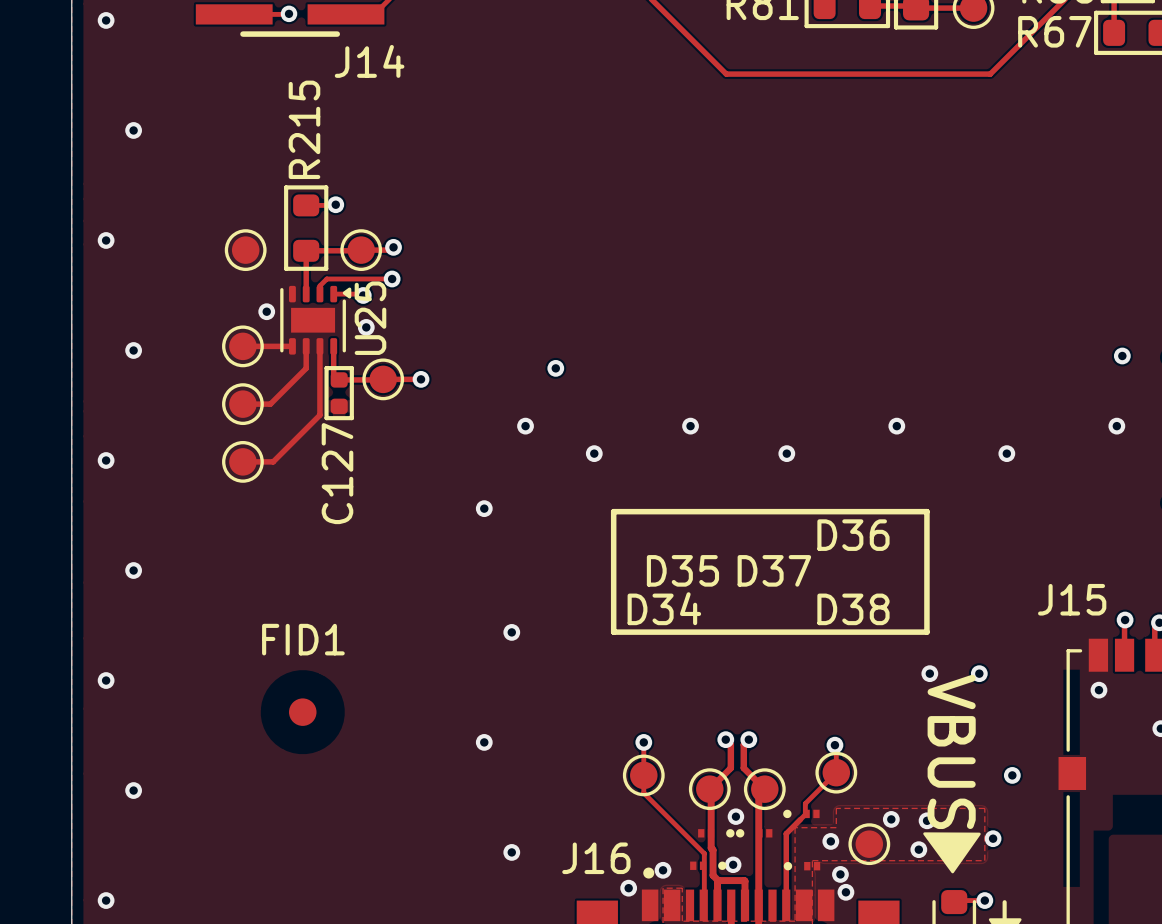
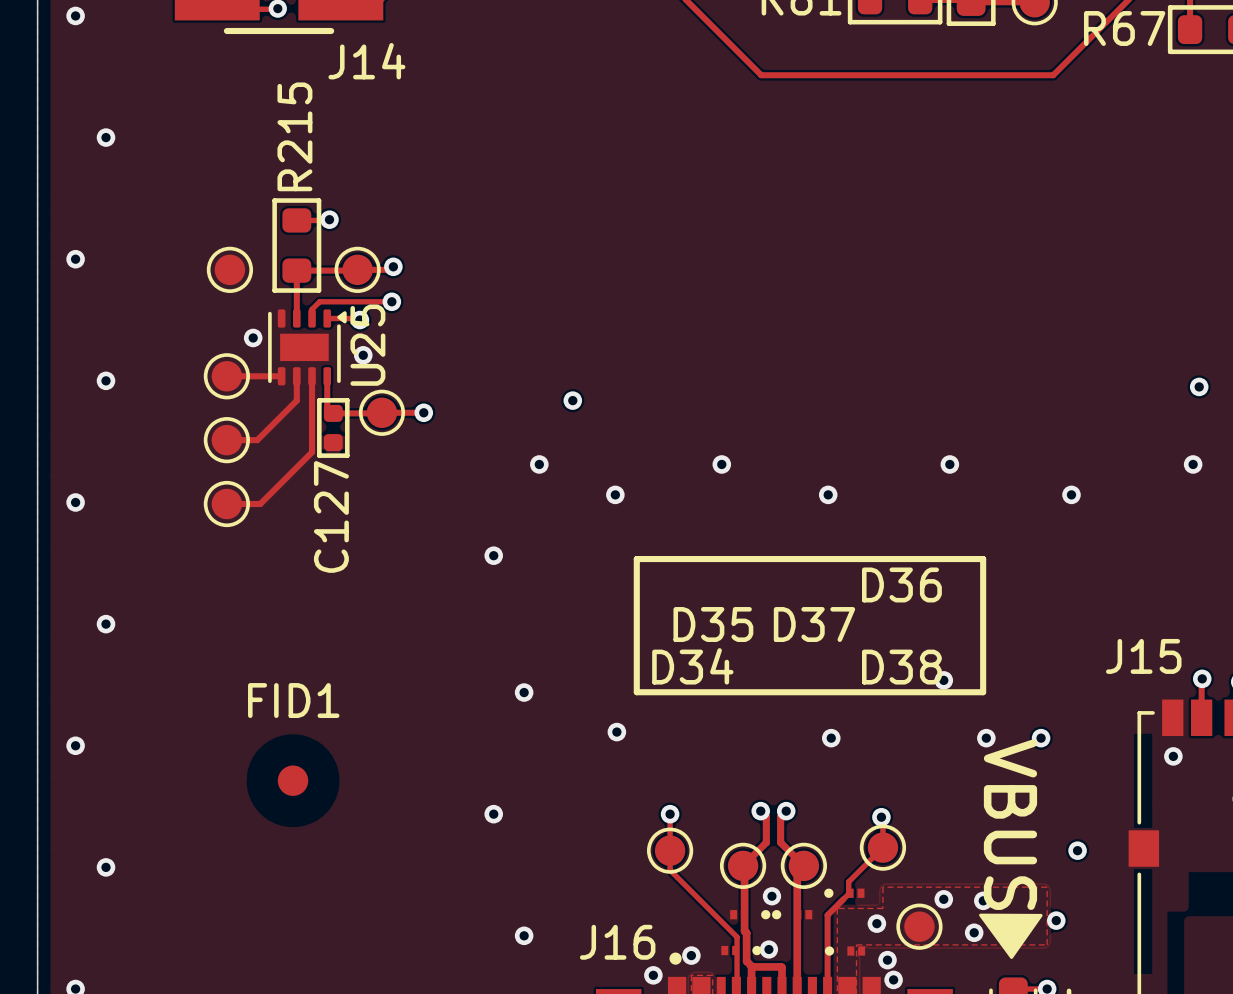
via: none -> (943, 680)
via: none -> (616, 732)
via: none -> (831, 738)

